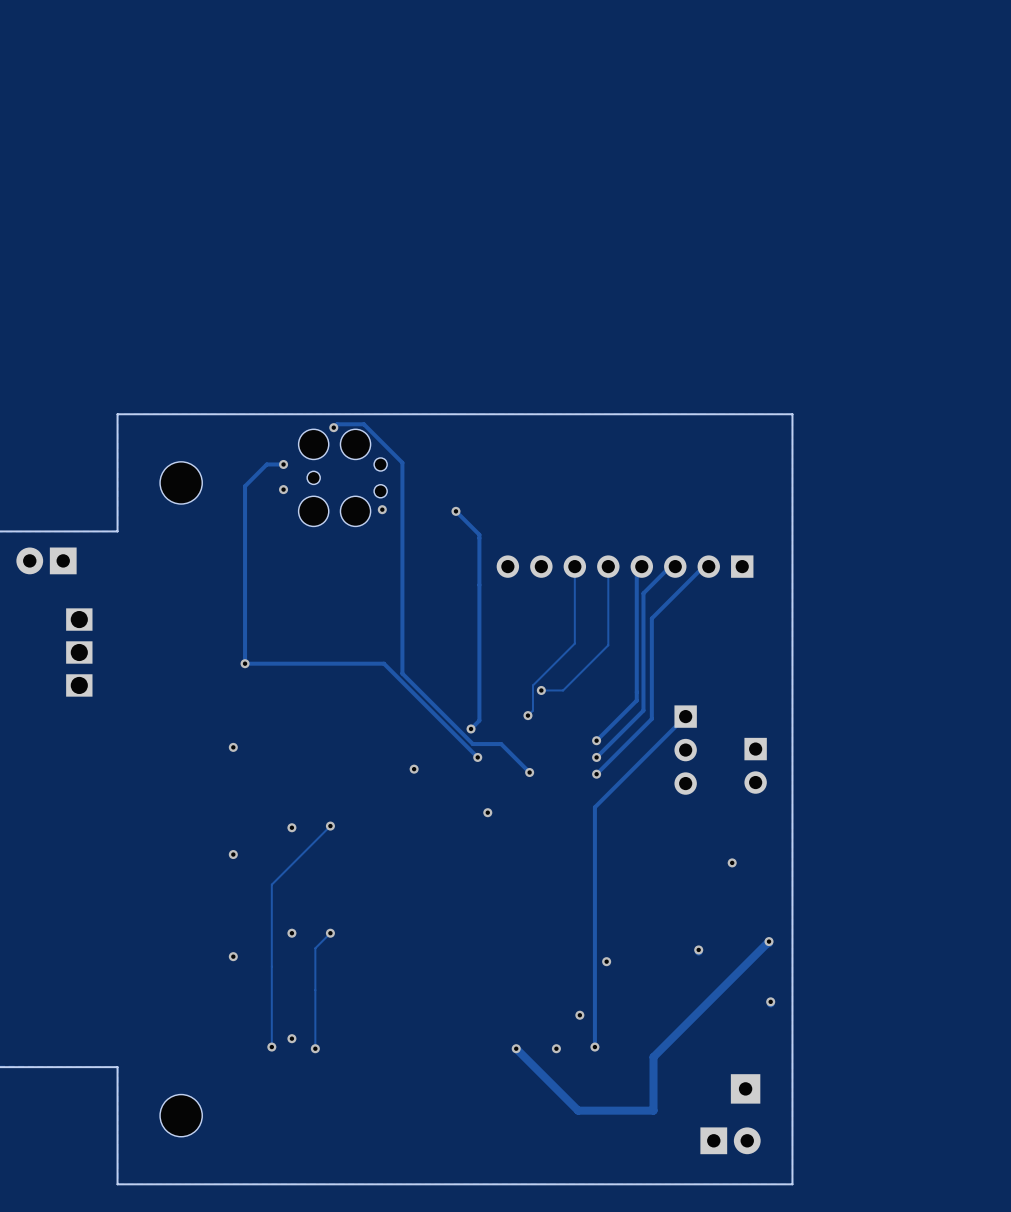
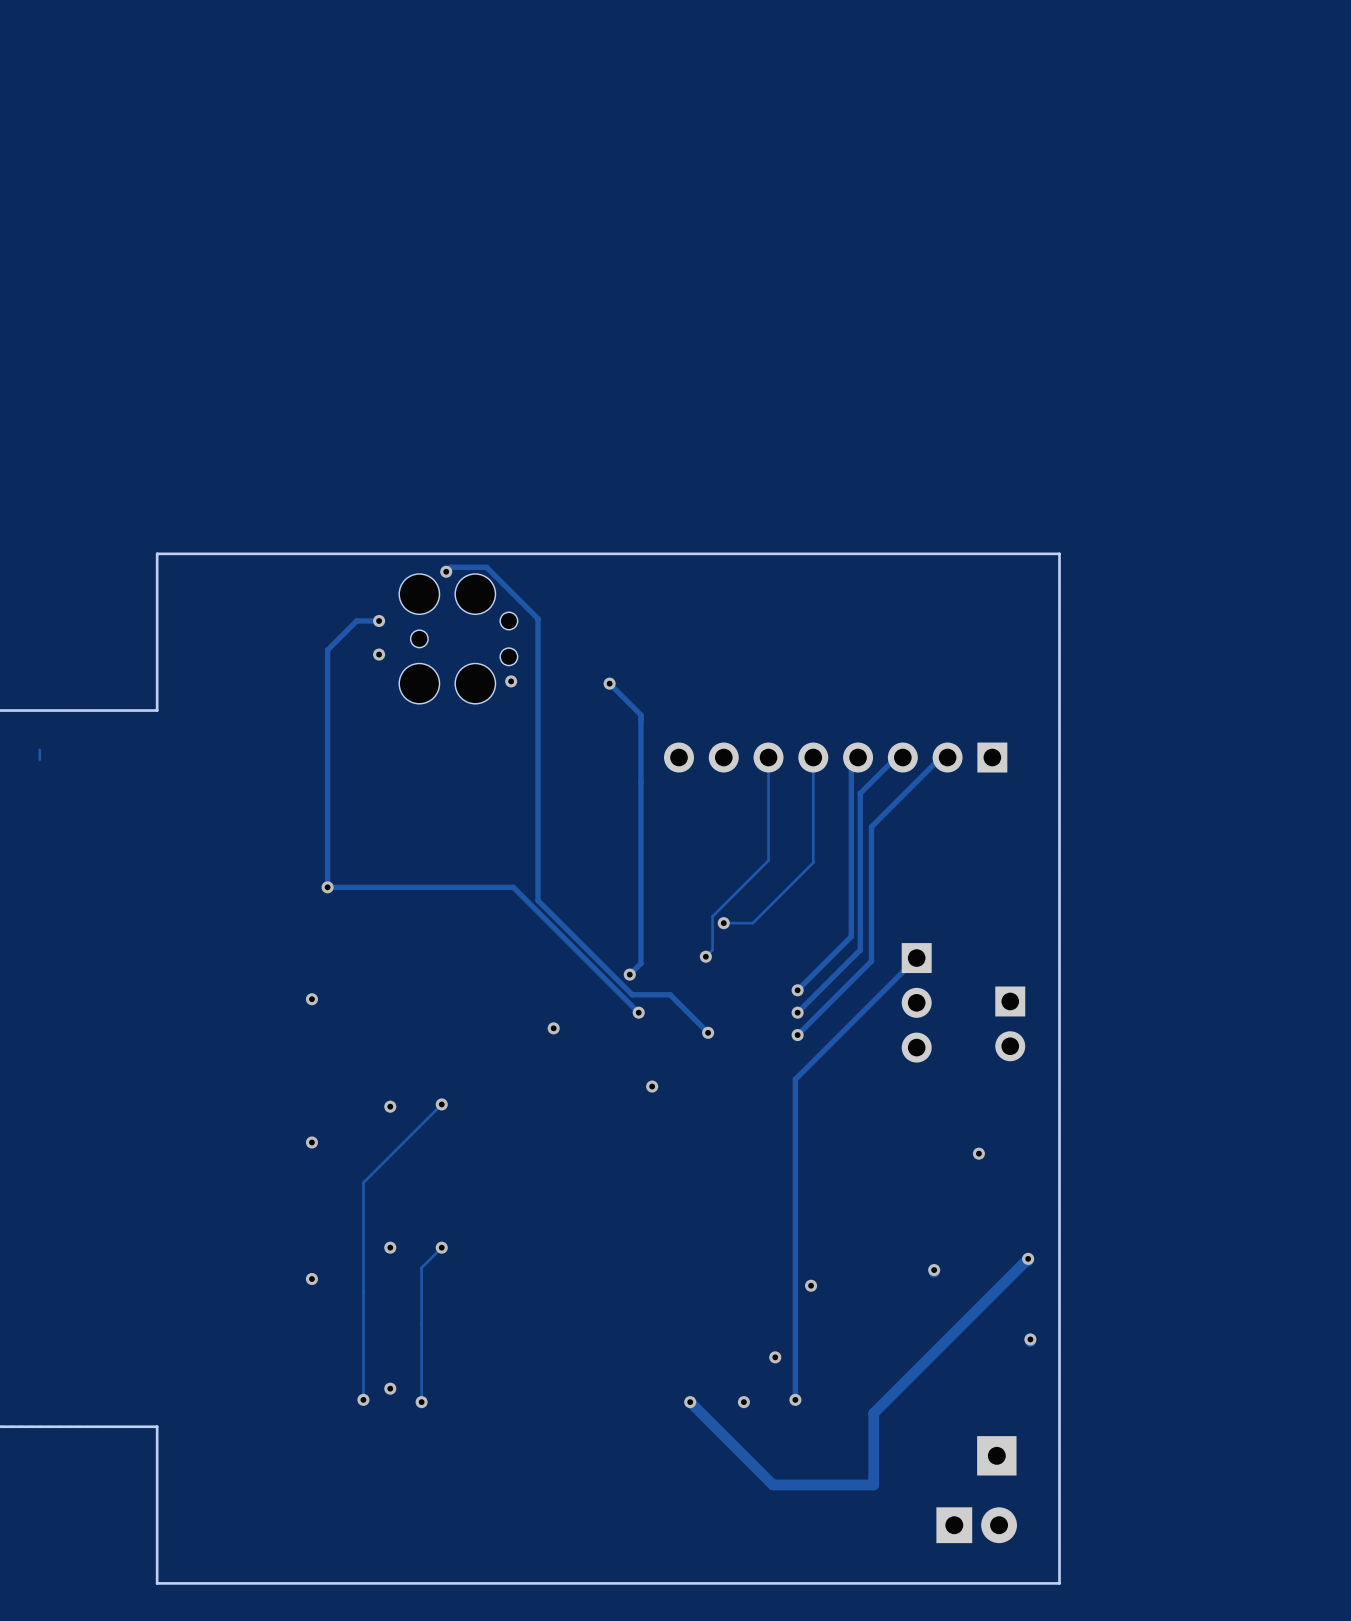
part: (181, 482) -> none
part: (46, 560) -> none
part: (79, 652) -> none
part: (181, 1115) -> none

